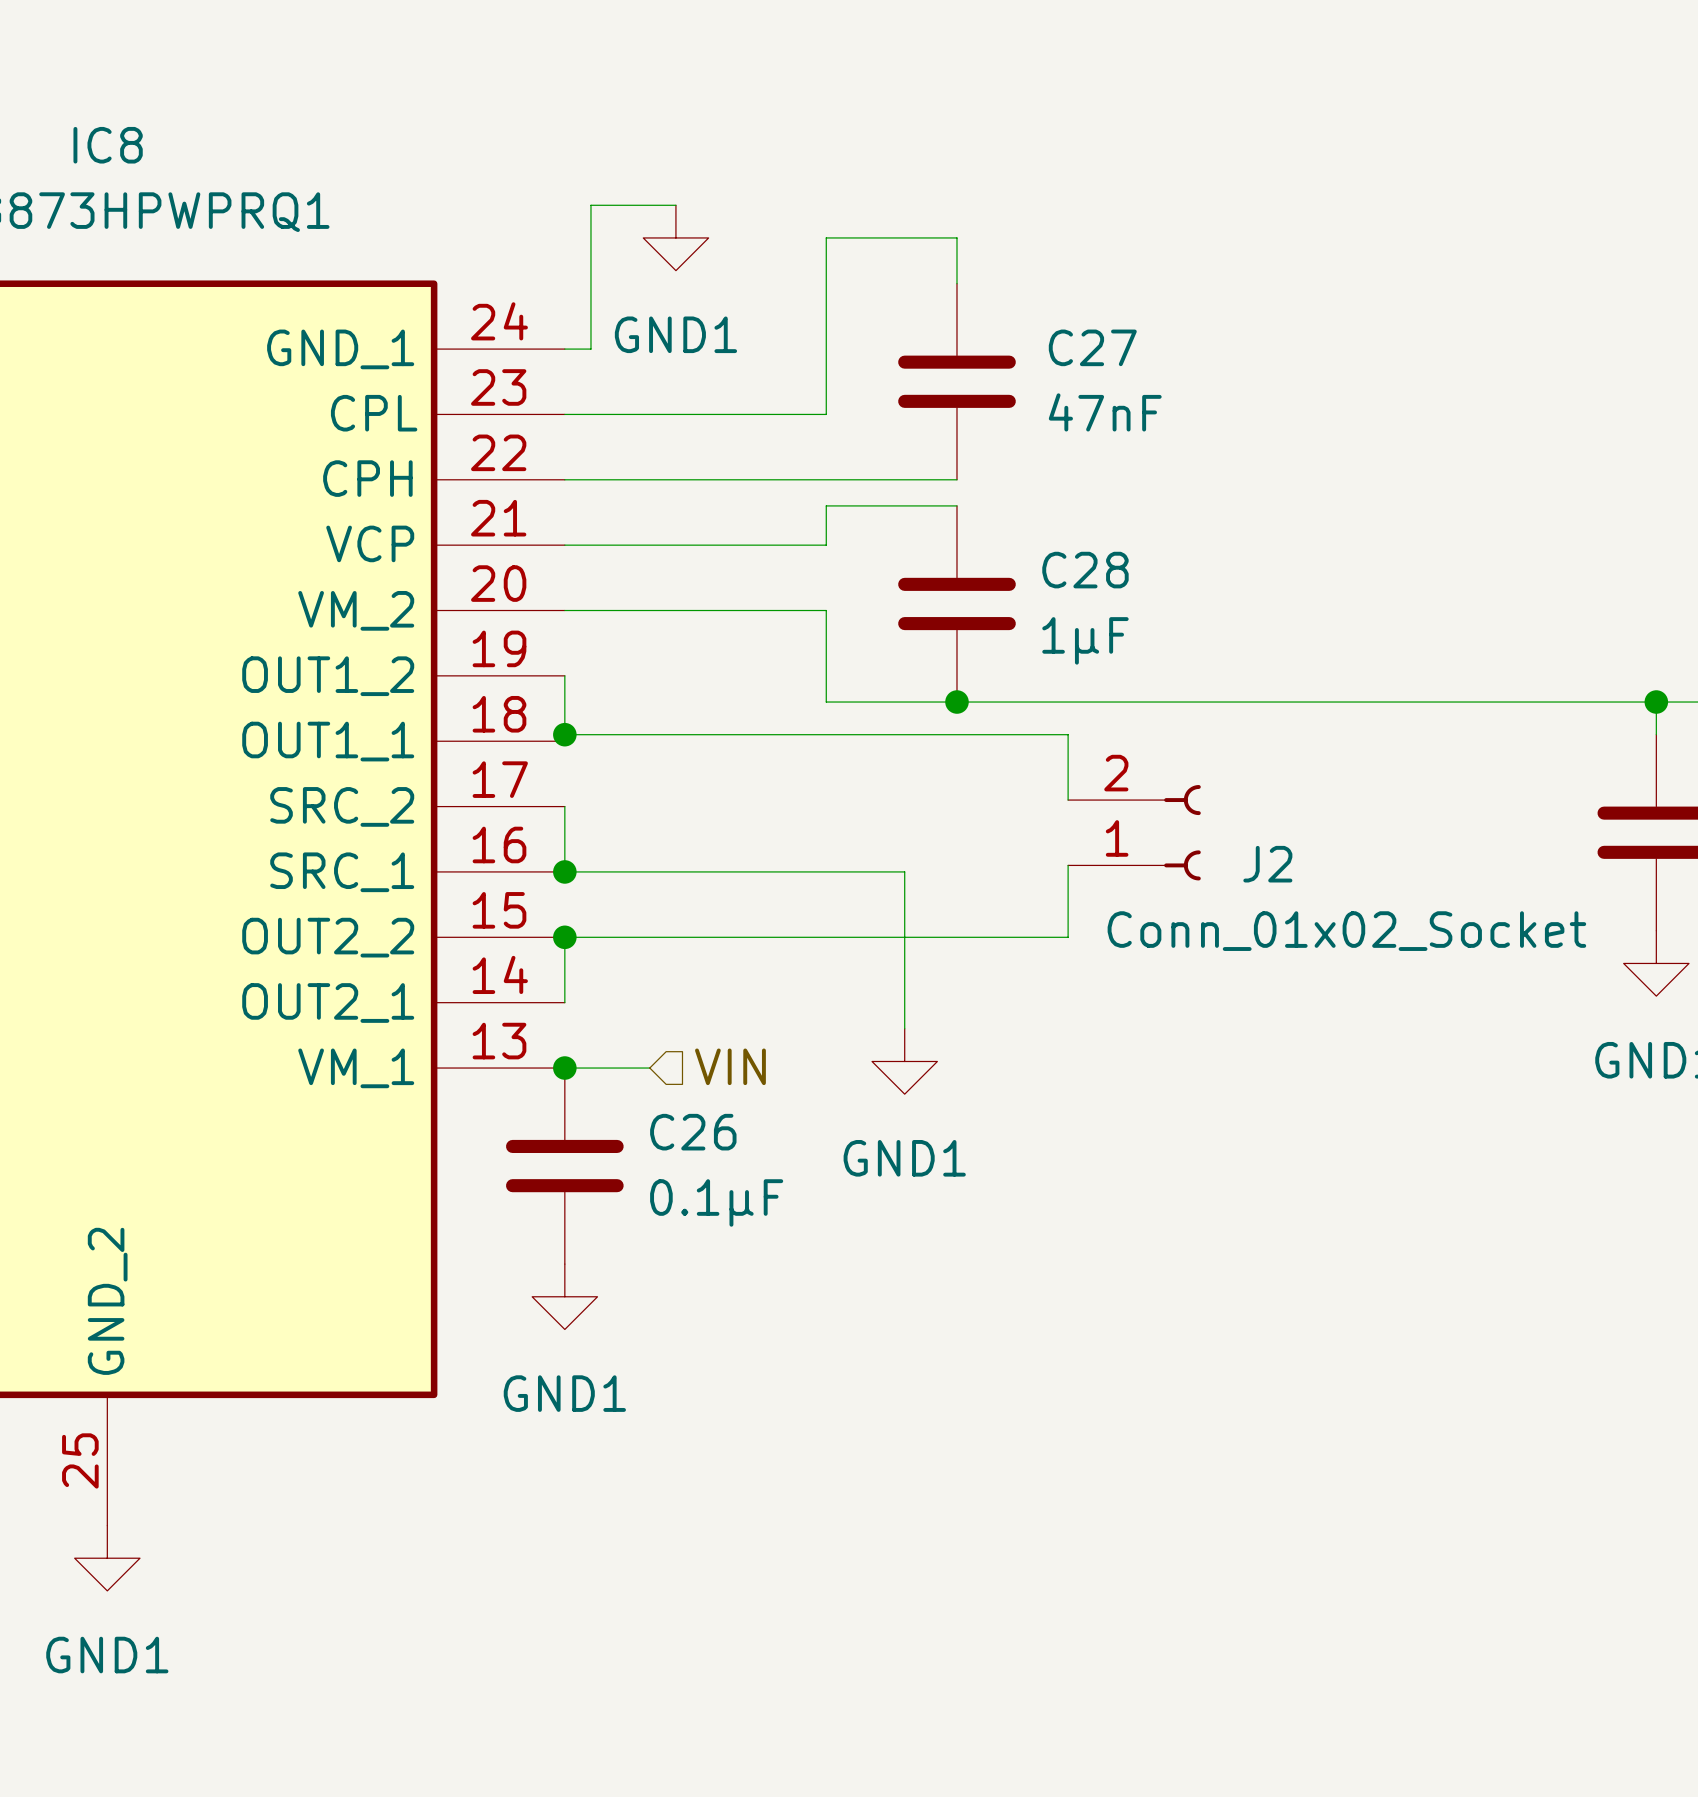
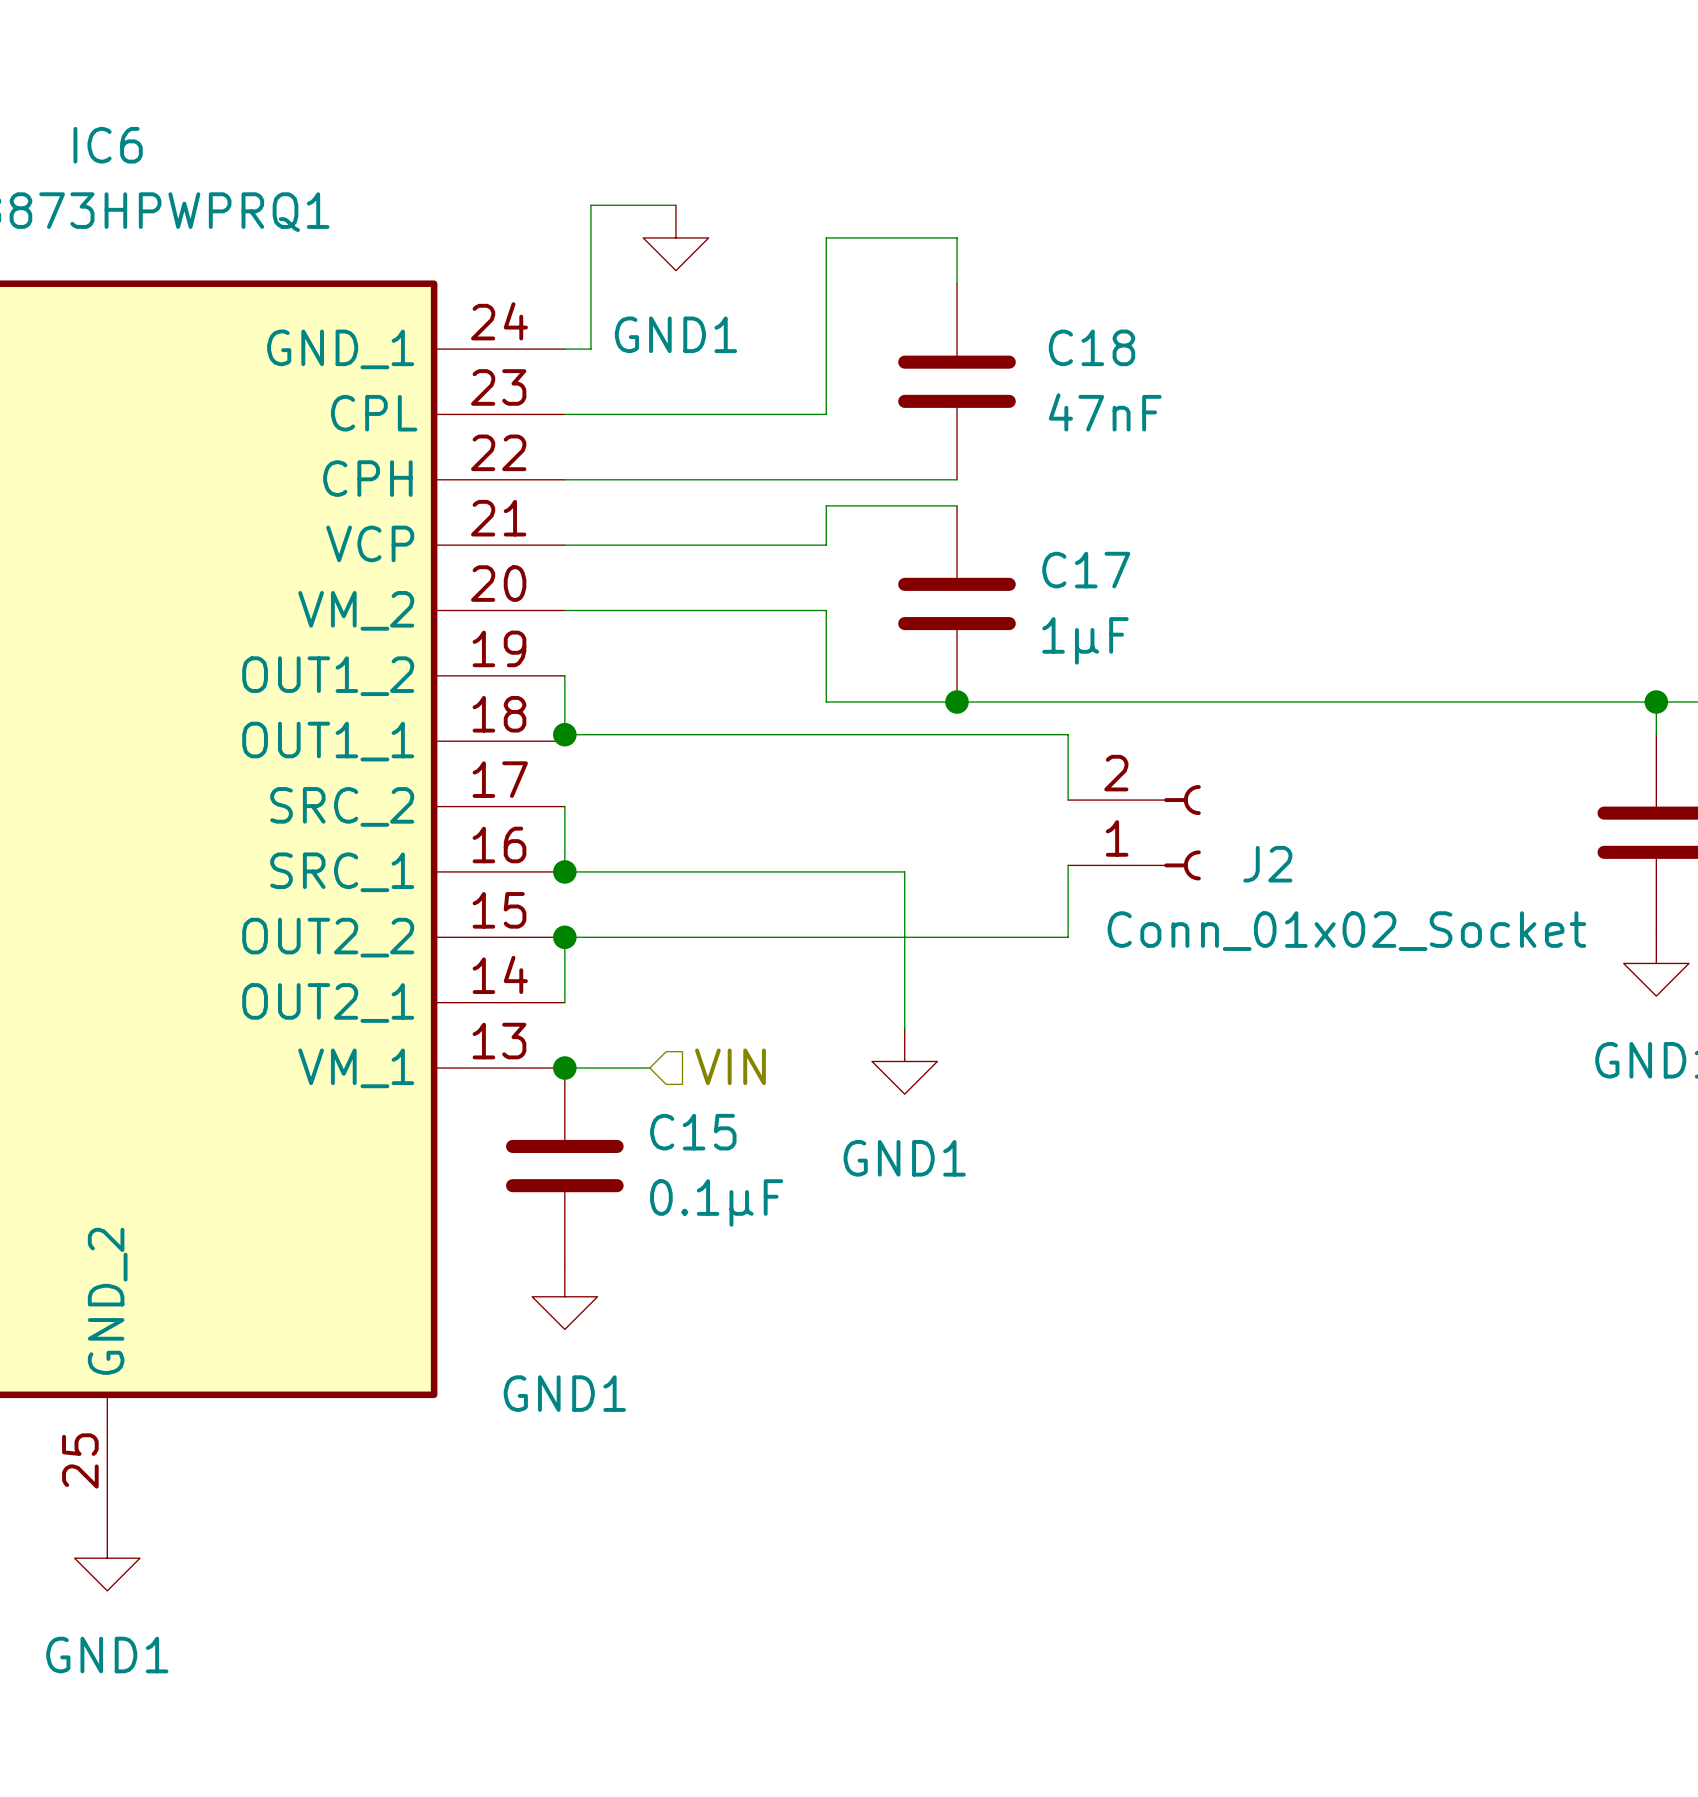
IC8 name: IC8 (108, 145) -> IC6 (108, 145)
C27 name: C27 (1092, 347) -> C18 (1092, 347)
C28 name: C28 (1085, 570) -> C17 (1086, 570)
C26 name: C26 (693, 1132) -> C15 (693, 1132)

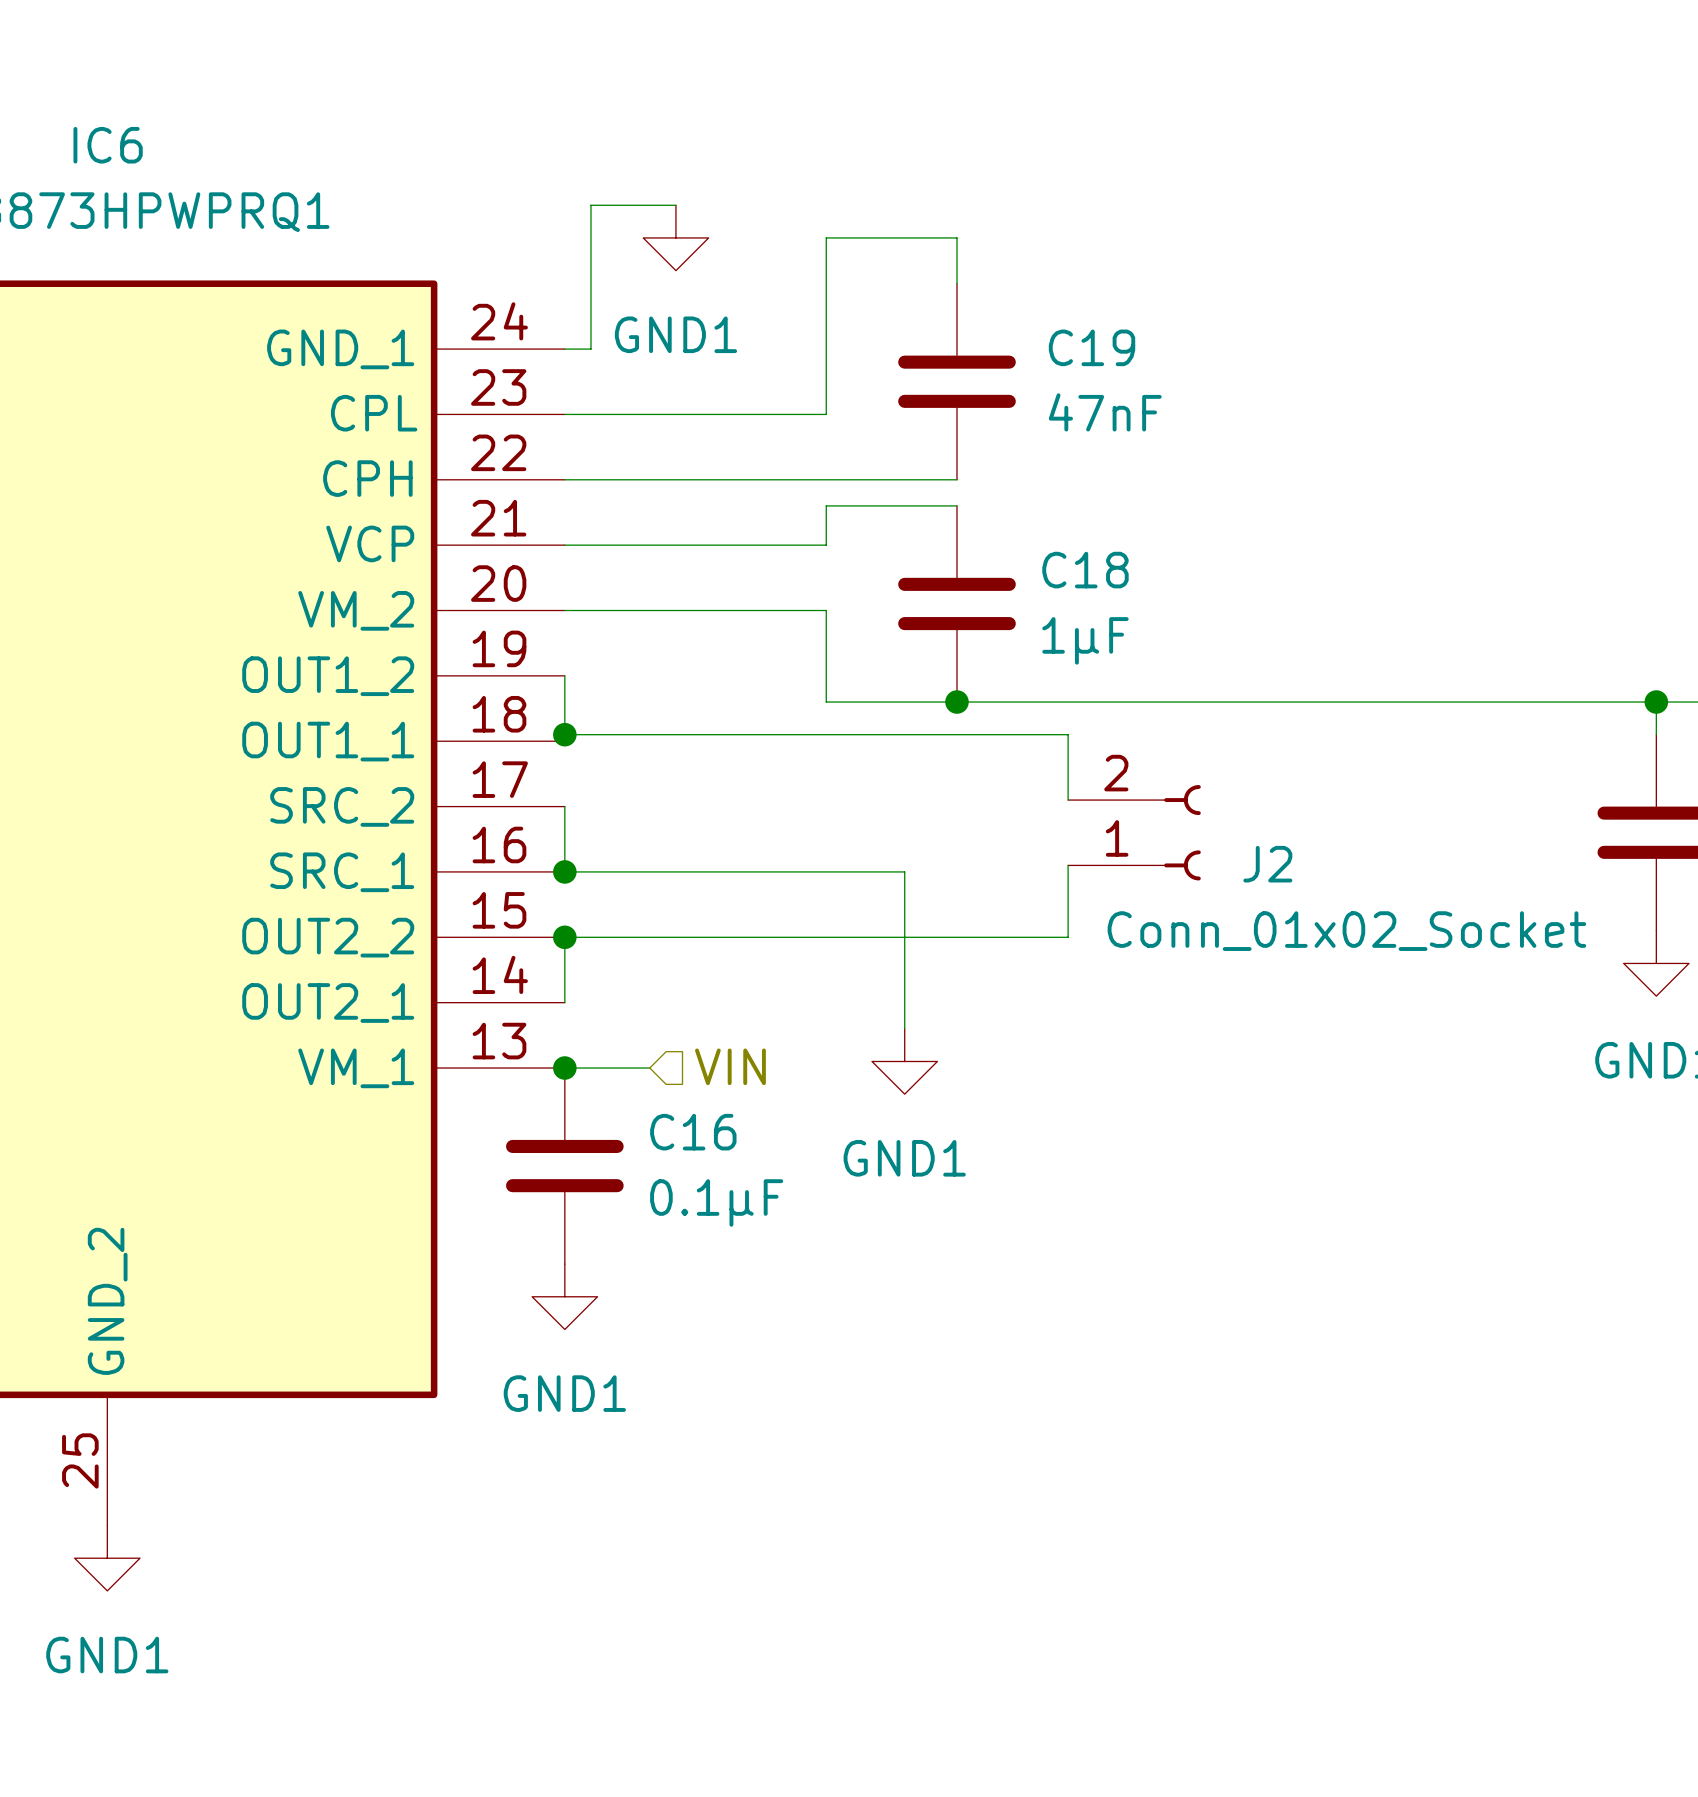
C18 name: C18 (1092, 347) -> C19 (1092, 347)
C17 name: C17 (1086, 570) -> C18 (1085, 570)
C15 name: C15 (693, 1132) -> C16 (693, 1132)

